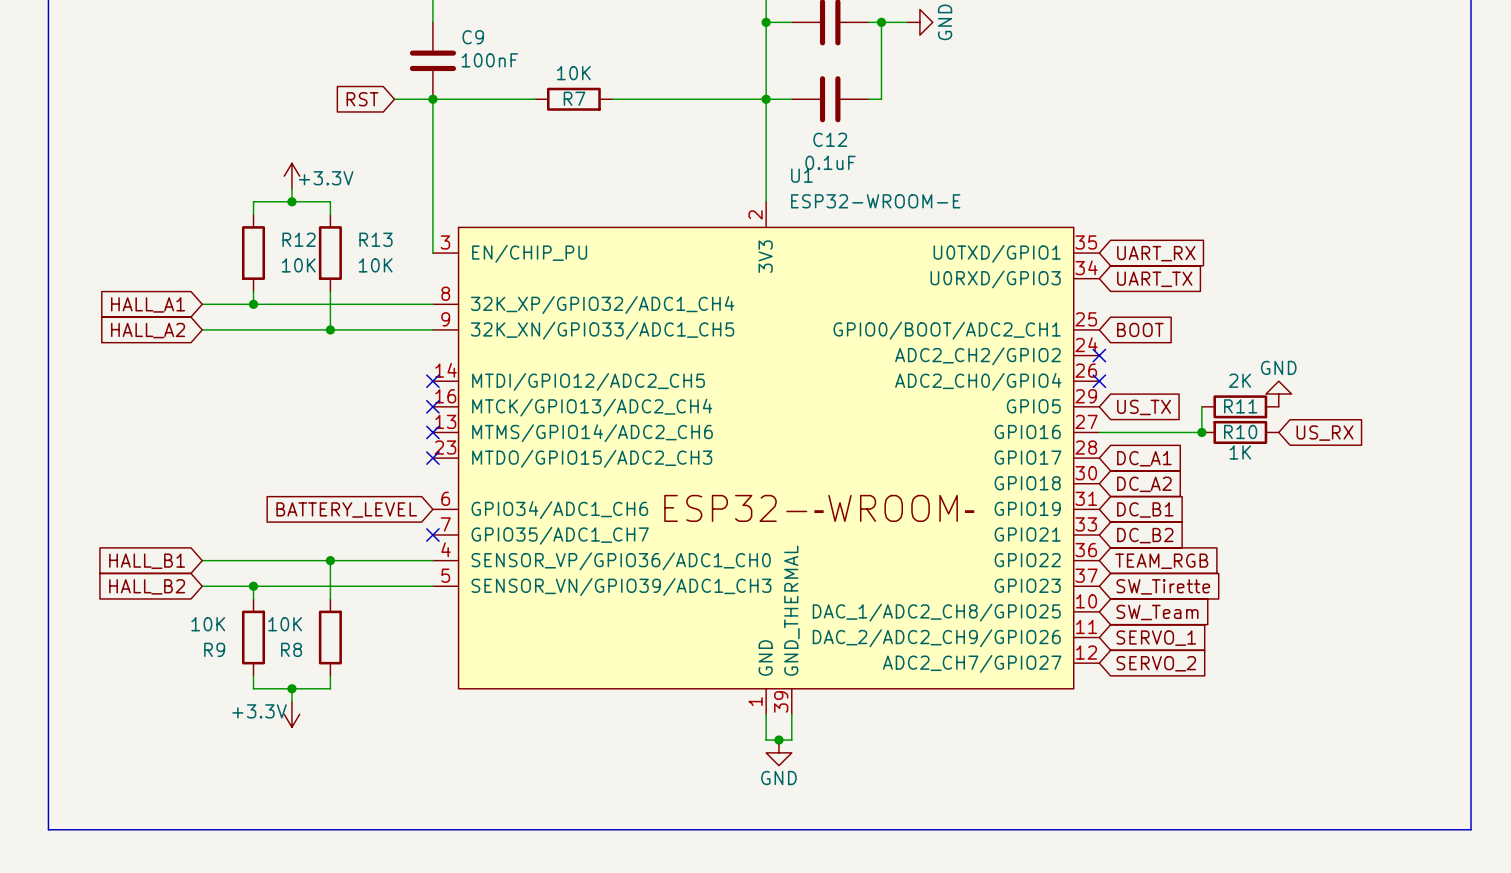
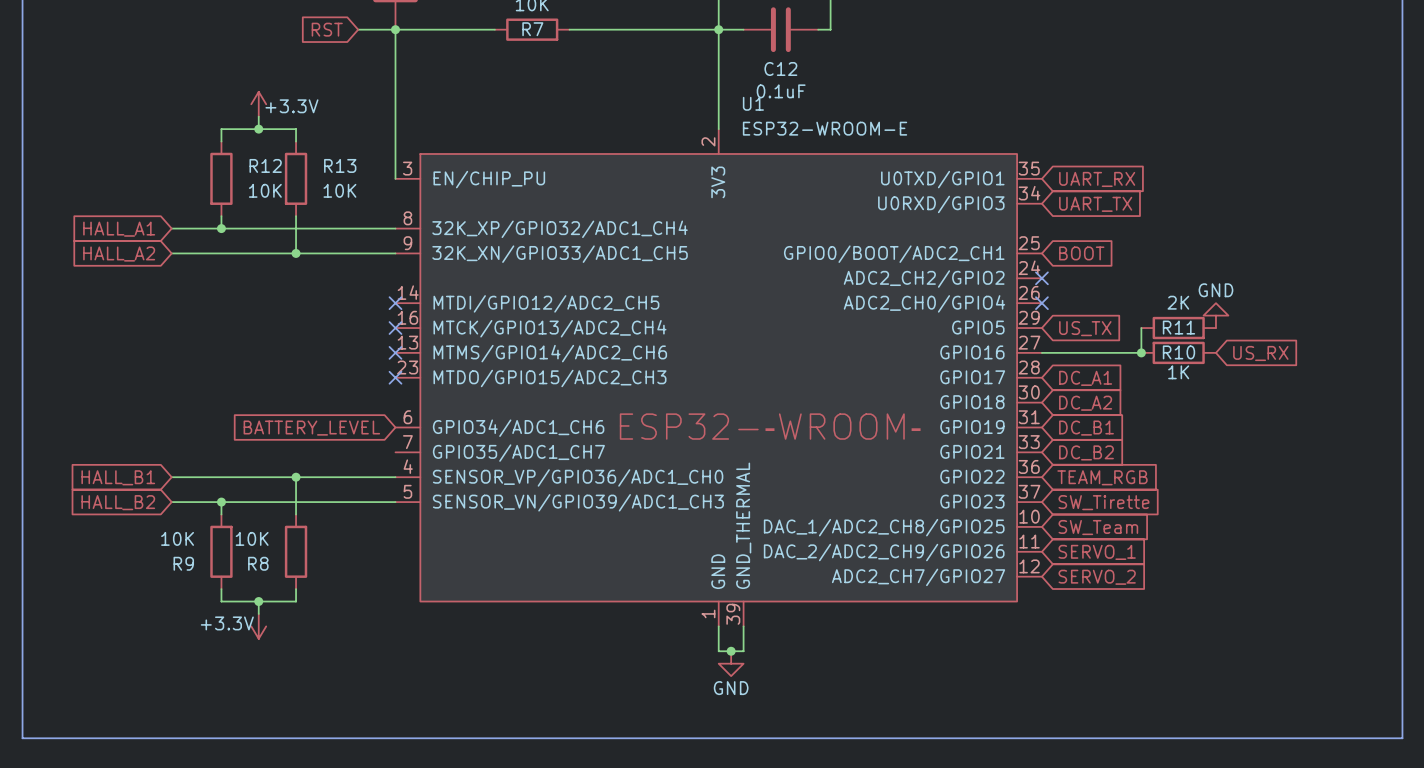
no-connect mark: (432, 535) -> none

